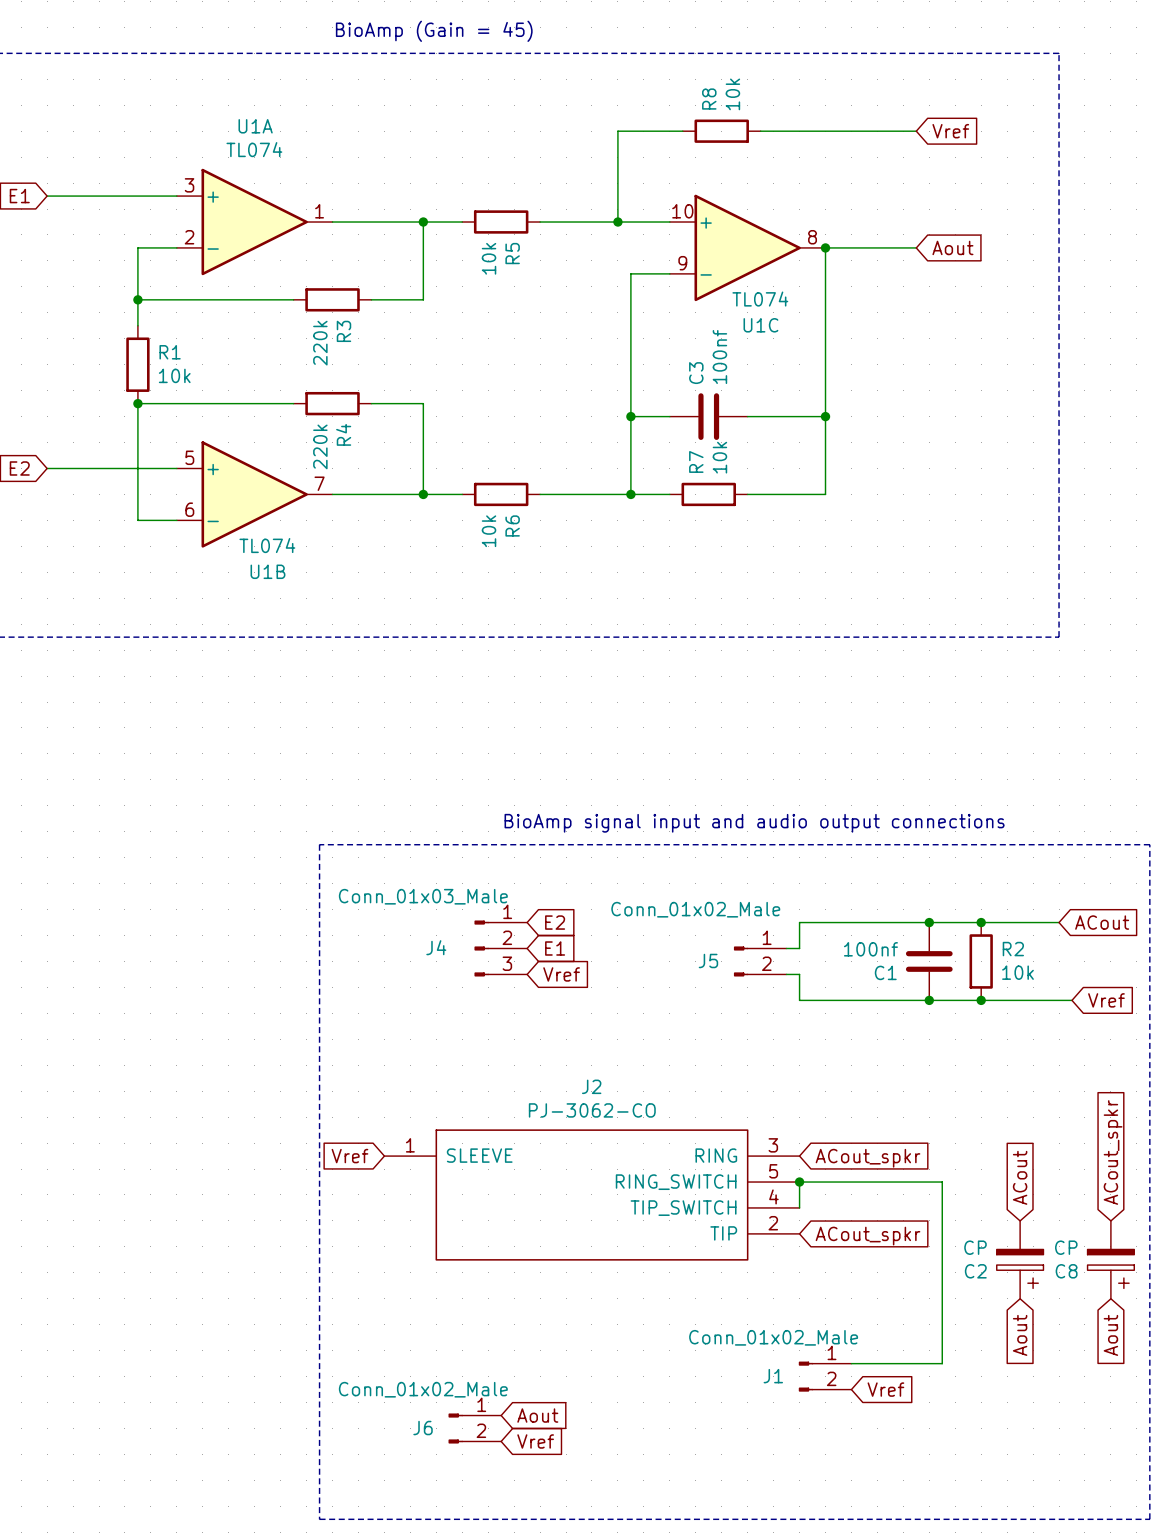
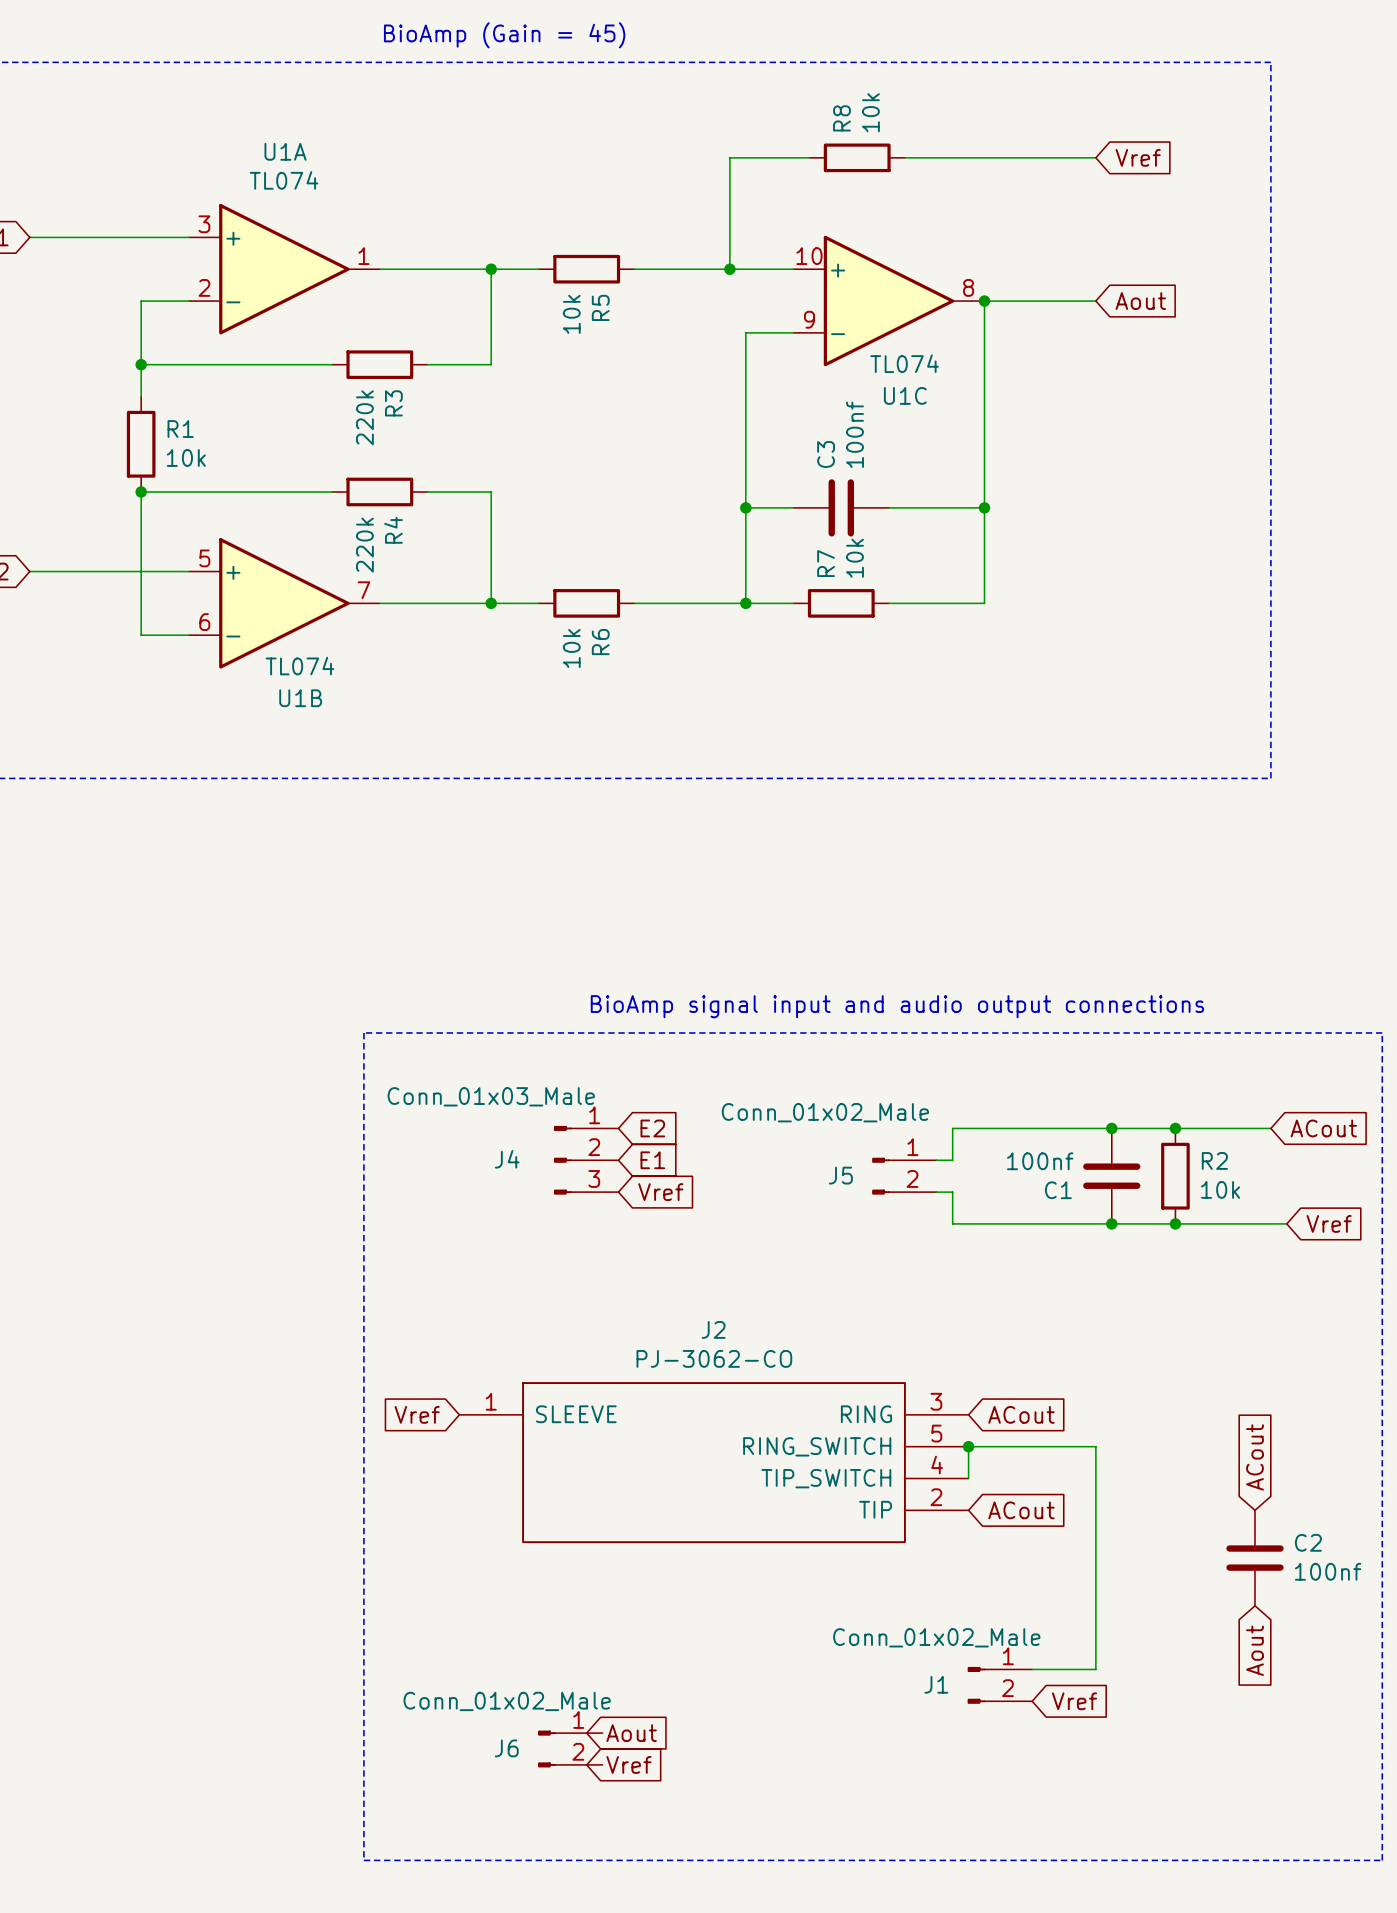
global label: ACout_spkr (1113, 1152) -> none
global label position: Vref (349, 1156) -> Vref (417, 1414)
global label: ACout_spkr (868, 1158) -> ACout (1021, 1414)
global label position: ACout (1020, 1177) -> ACout (1254, 1457)
junction position: (799, 1182) -> (968, 1446)
wire: (812, 1182) (799, 1182) (799, 1207) -> (968, 1446) (968, 1478)
wire: (916, 1182) (942, 1182) (942, 1363) (916, 1363) -> (1095, 1446) (1095, 1669)
J2 position: (591, 1194) -> (713, 1462)
C2 symbol: [996, 1220, 1044, 1299] -> [1226, 1510, 1284, 1606]
global label: ACout_spkr (868, 1236) -> ACout (1021, 1510)
C2 value: CP (975, 1247) -> 100nf (1328, 1571)
C8: CP (1110, 1259) -> none
C2 name position: C2 (975, 1271) -> C2 (1308, 1542)
global label position: Aout (1020, 1335) -> Aout (1254, 1650)
global label: Aout (1110, 1335) -> none
J1 position: (825, 1376) -> (999, 1685)
global label position: Vref (885, 1389) -> Vref (1074, 1701)
J6 position: (474, 1428) -> (570, 1749)

